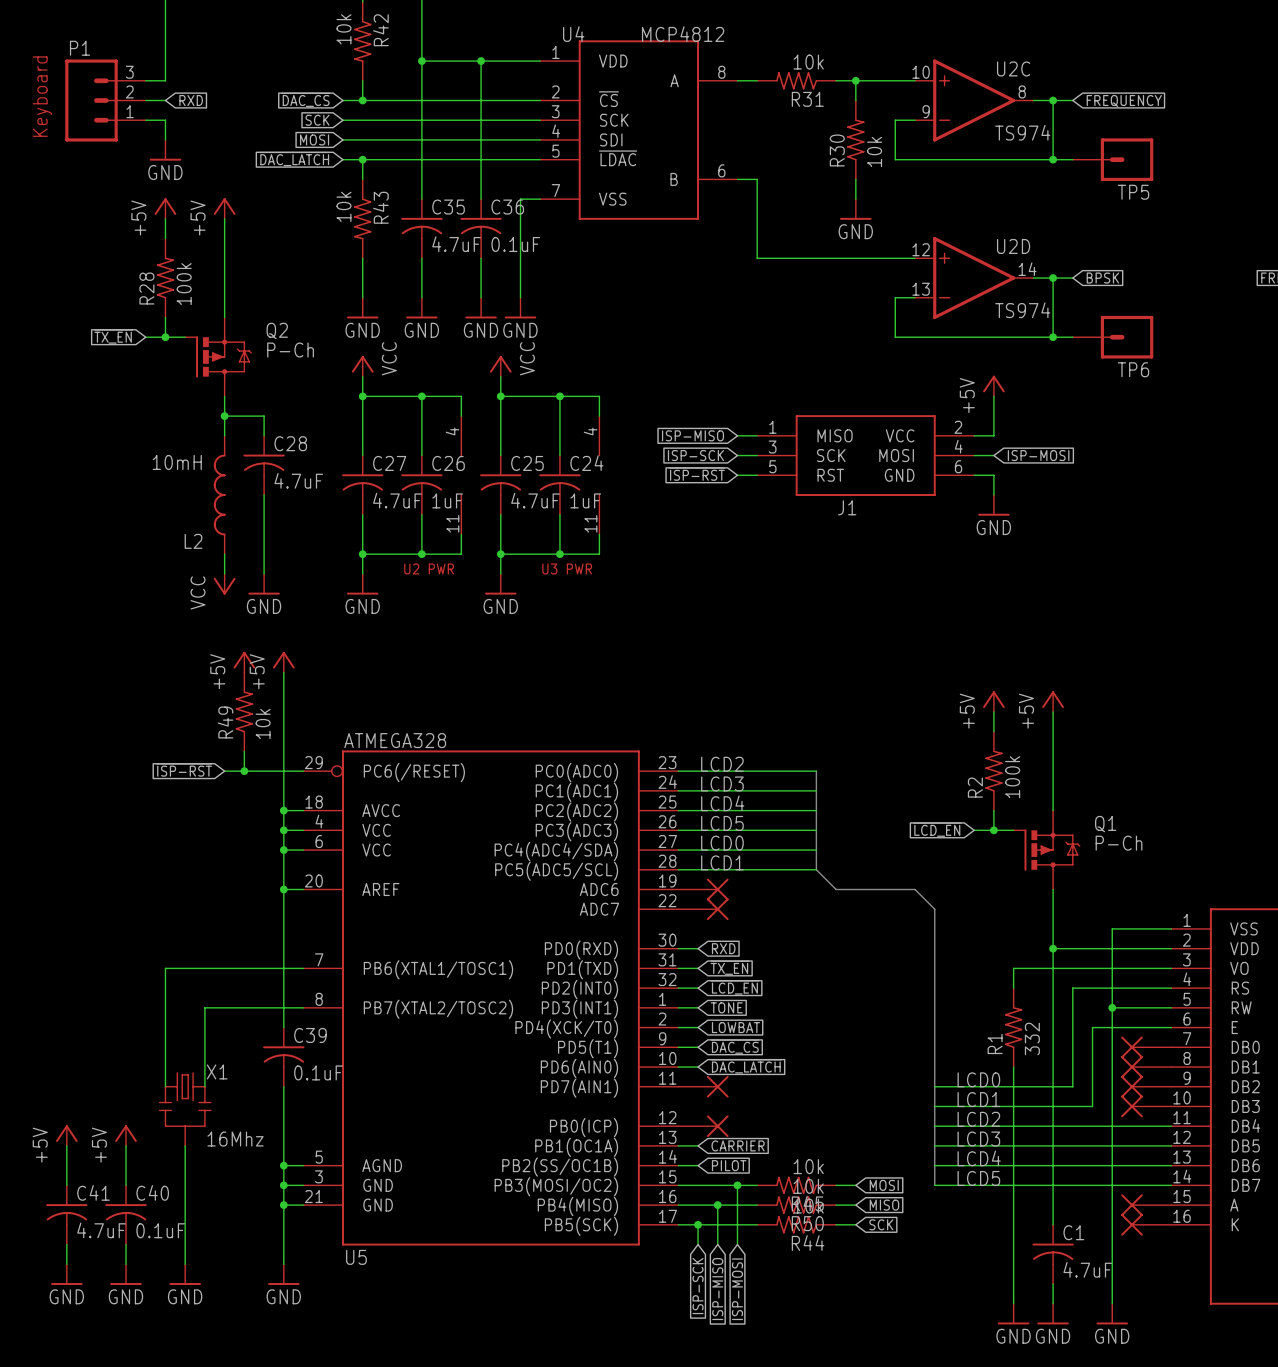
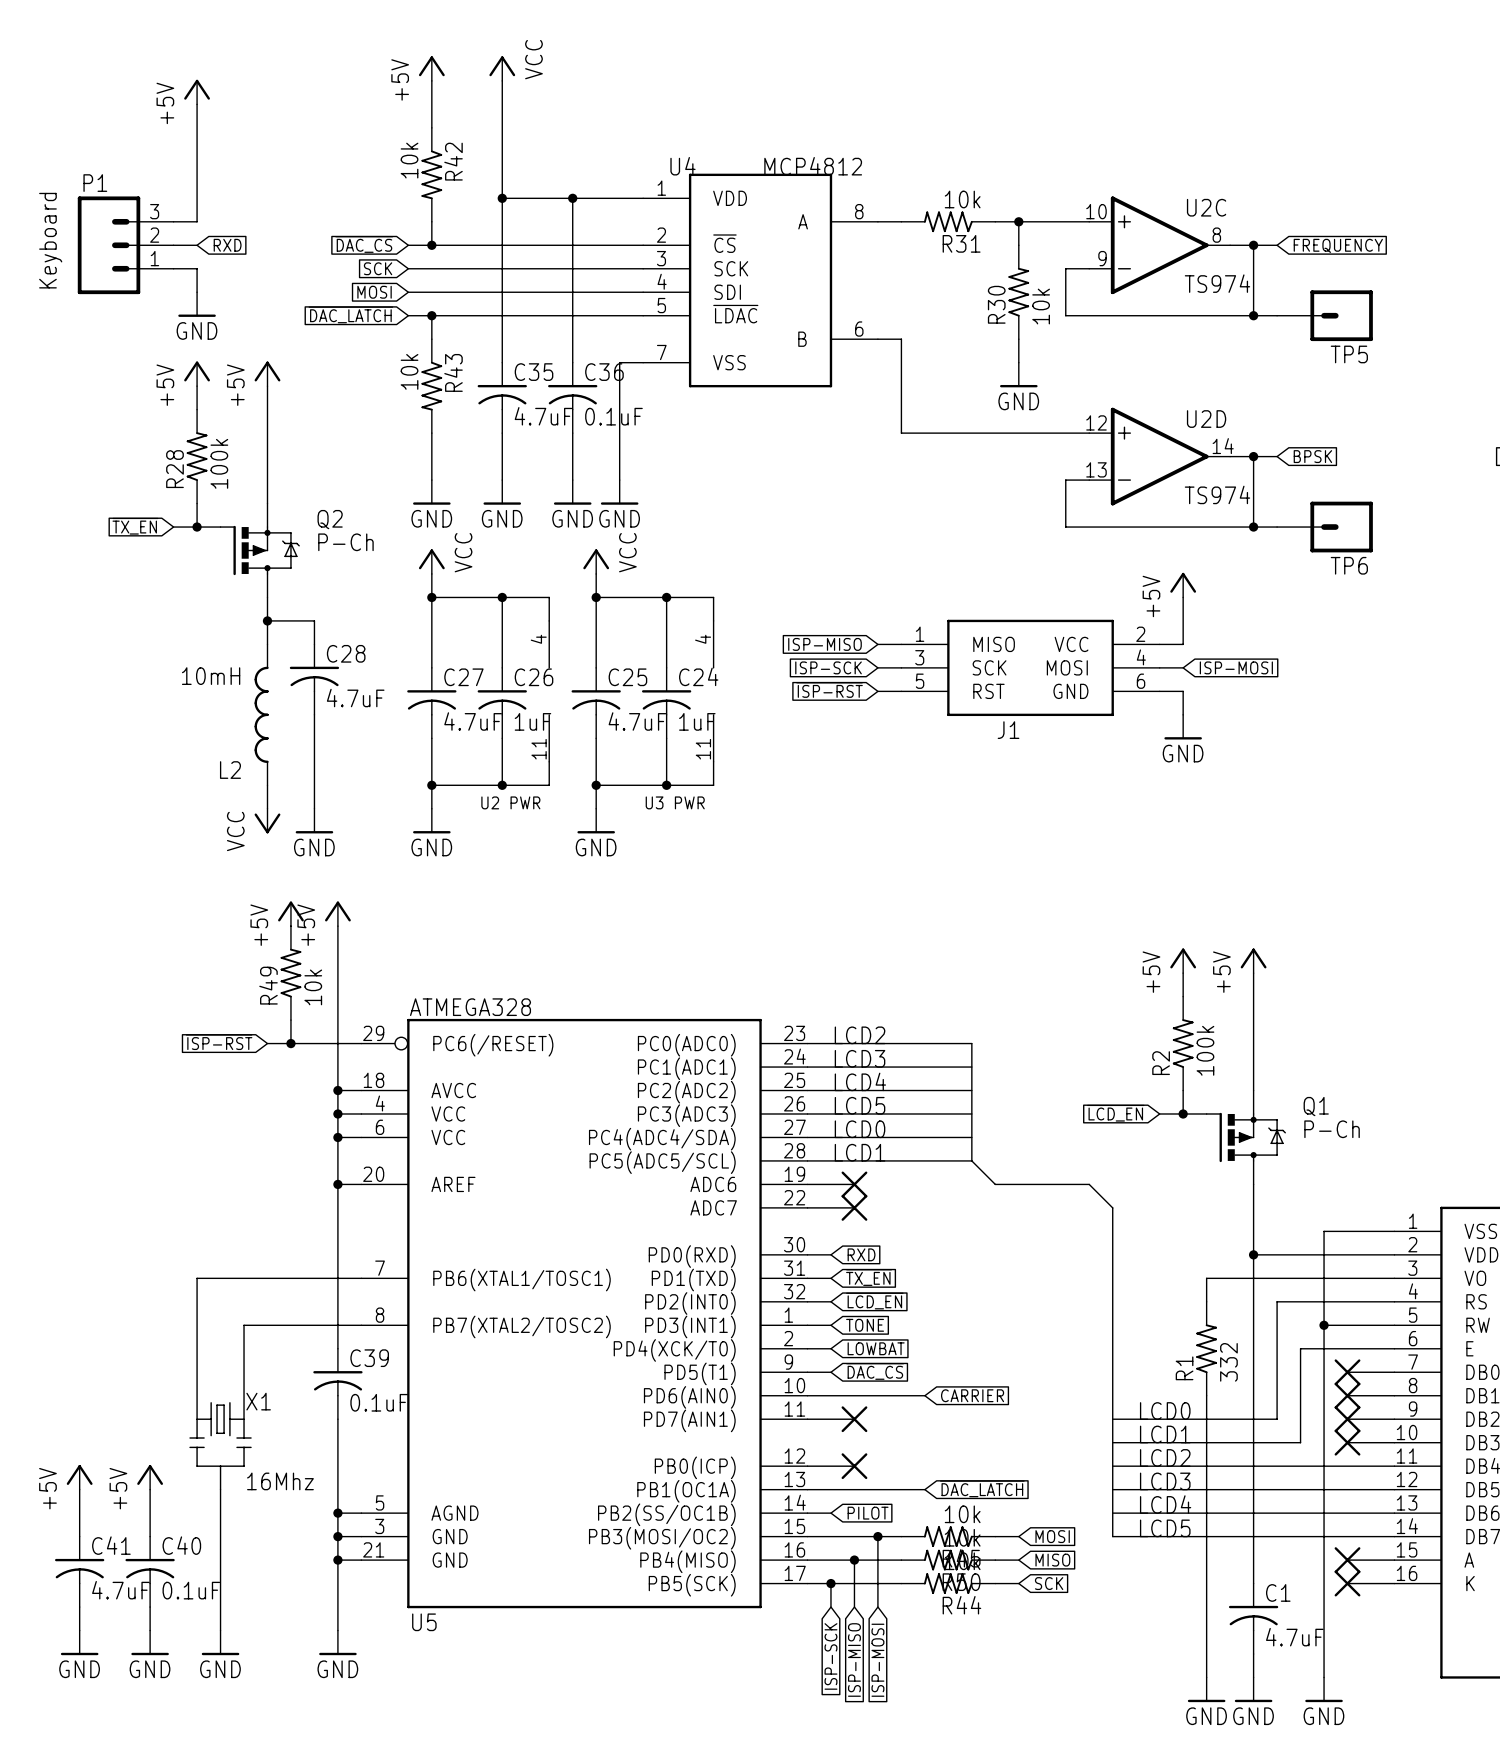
global label position: ~{DAC_LATCH} (746, 1066) -> ~{DAC_LATCH} (982, 1488)
wire: none -> (830, 1395) (924, 1395)
wire: none -> (830, 1489) (924, 1489)
global label position: CARRIER (738, 1145) -> CARRIER (972, 1395)

